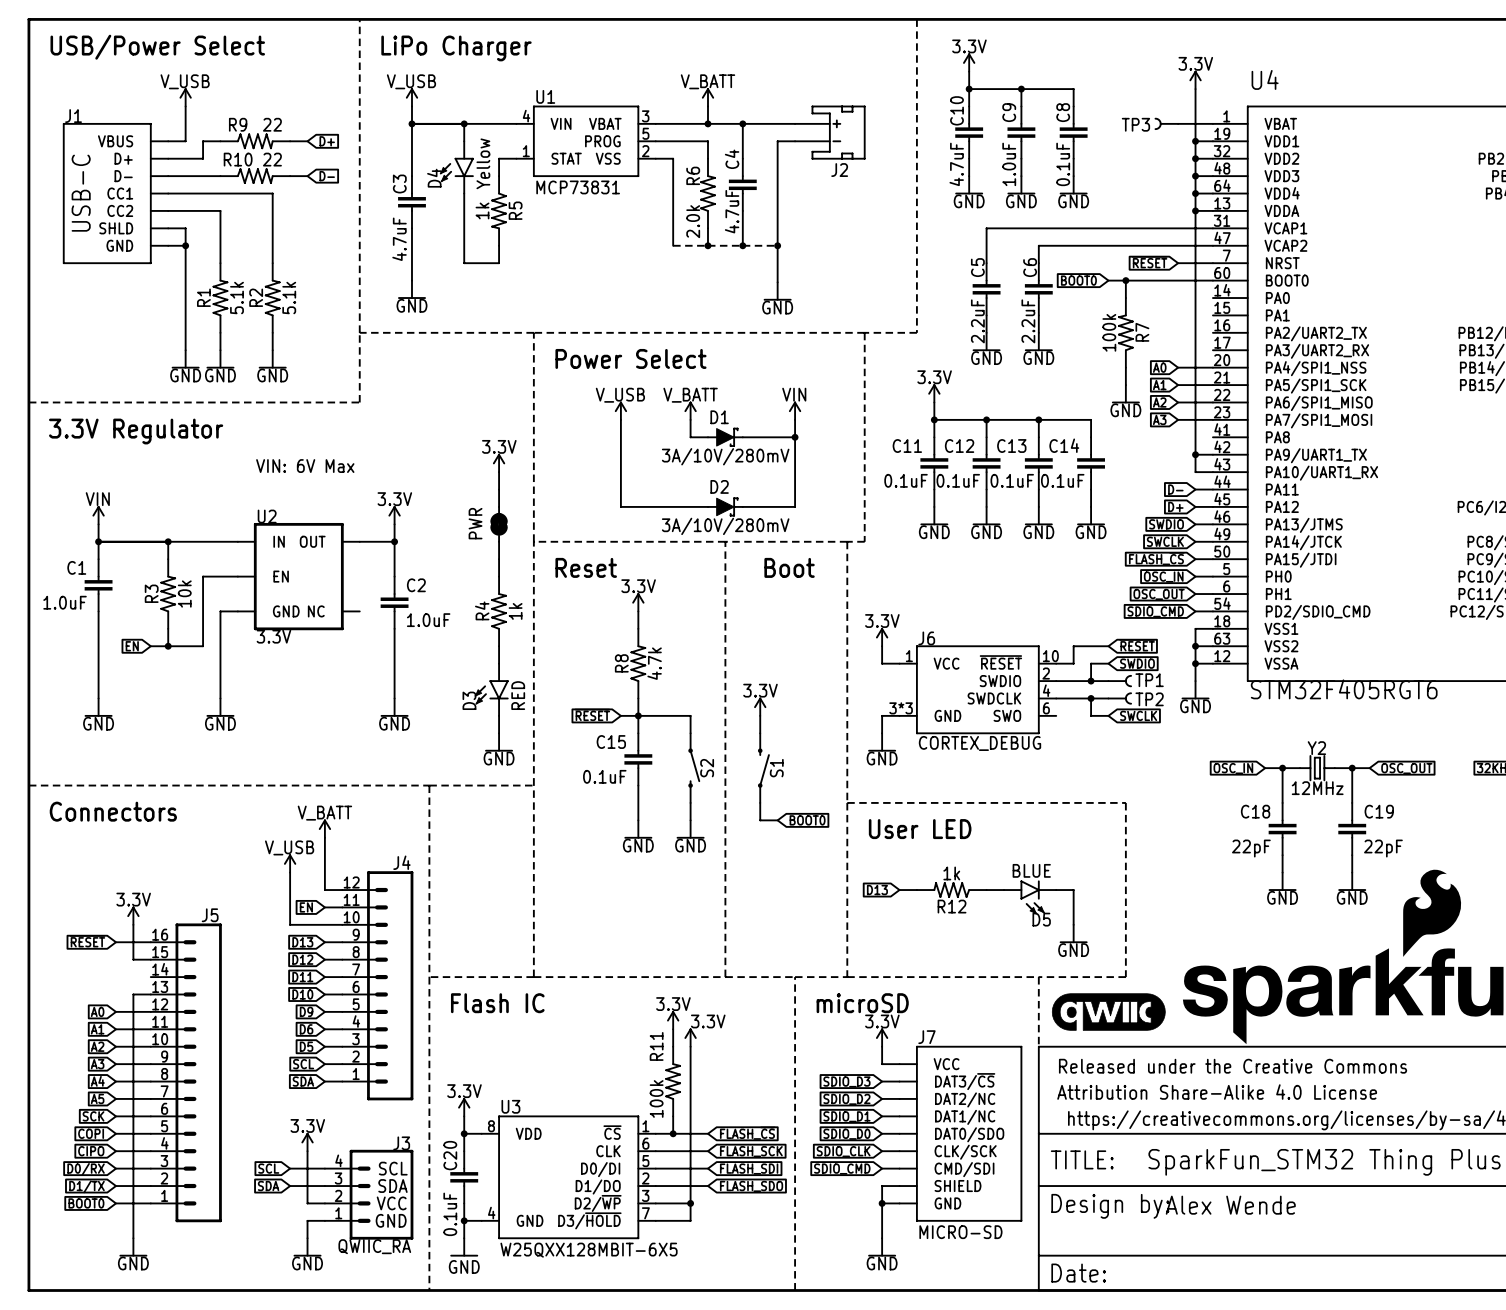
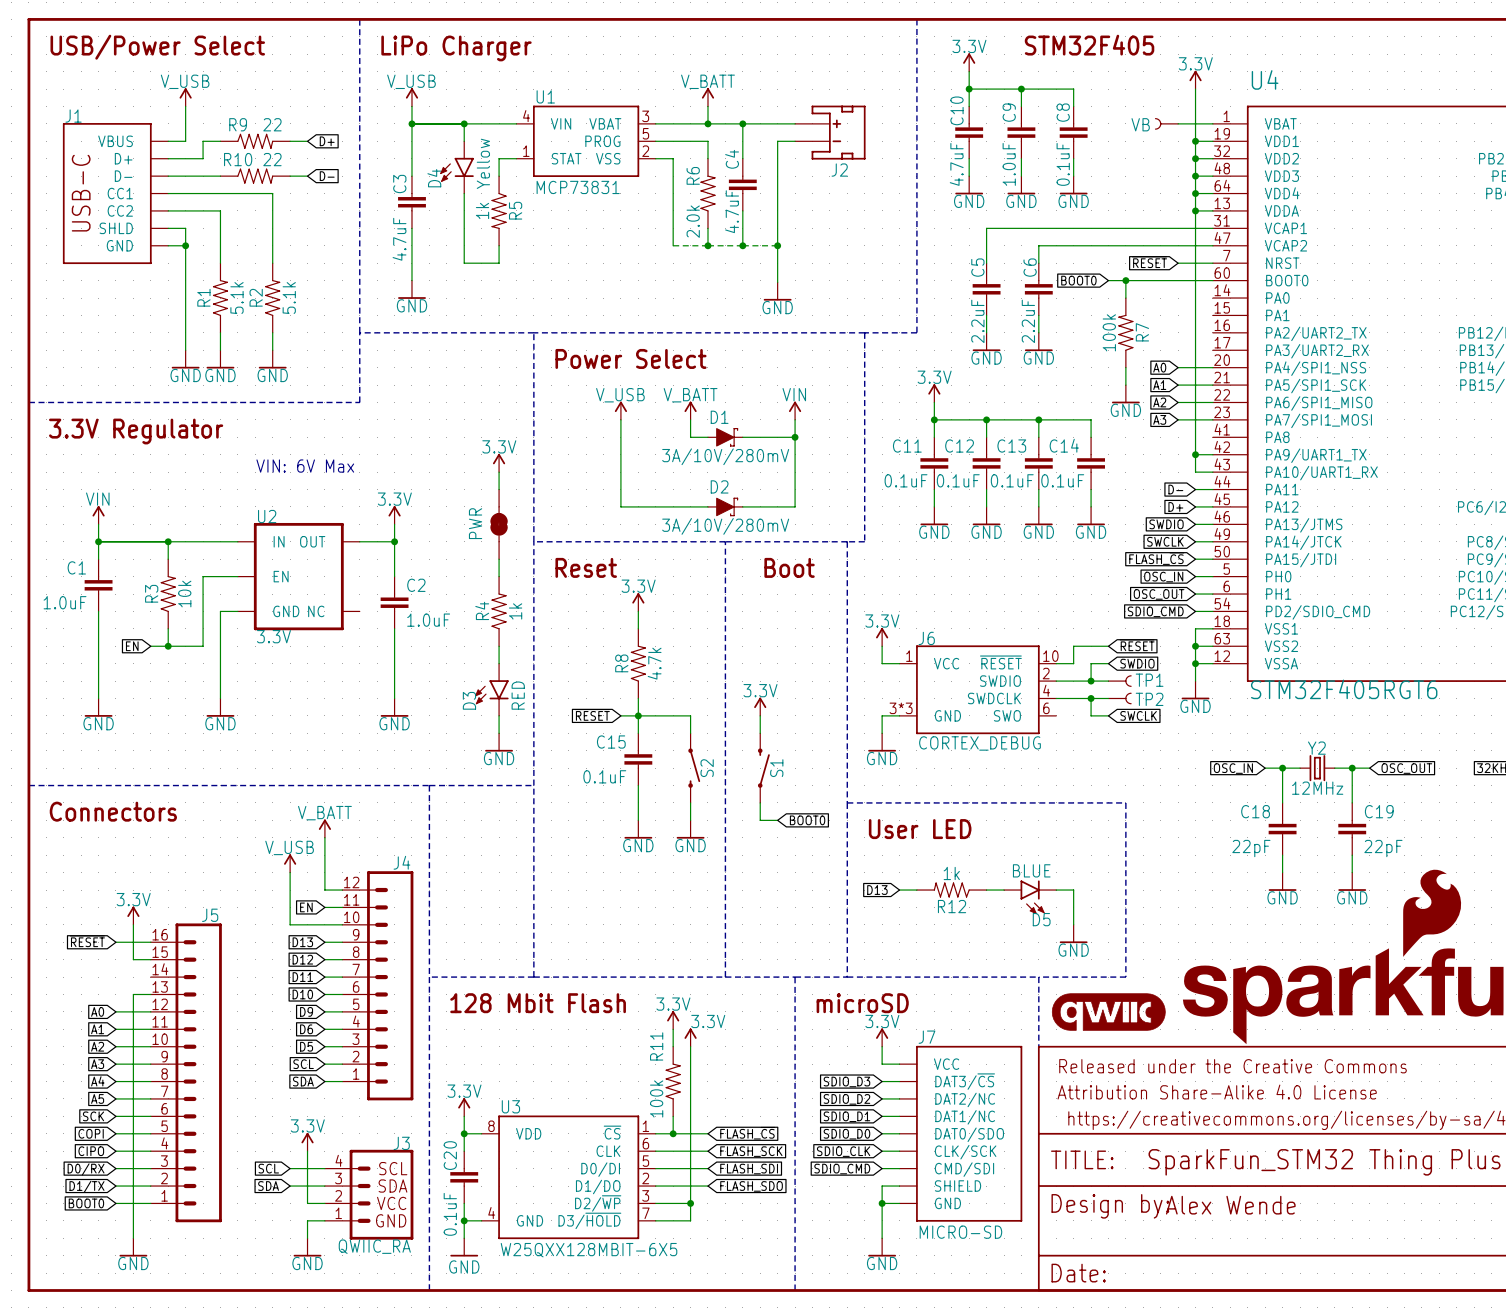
text: none -> STM32F405 (1089, 45)
TP3 name: TP3 (1135, 124) -> VB (1140, 124)
text: Flash IC (497, 1003) -> 128 Mbit Flash (538, 1003)

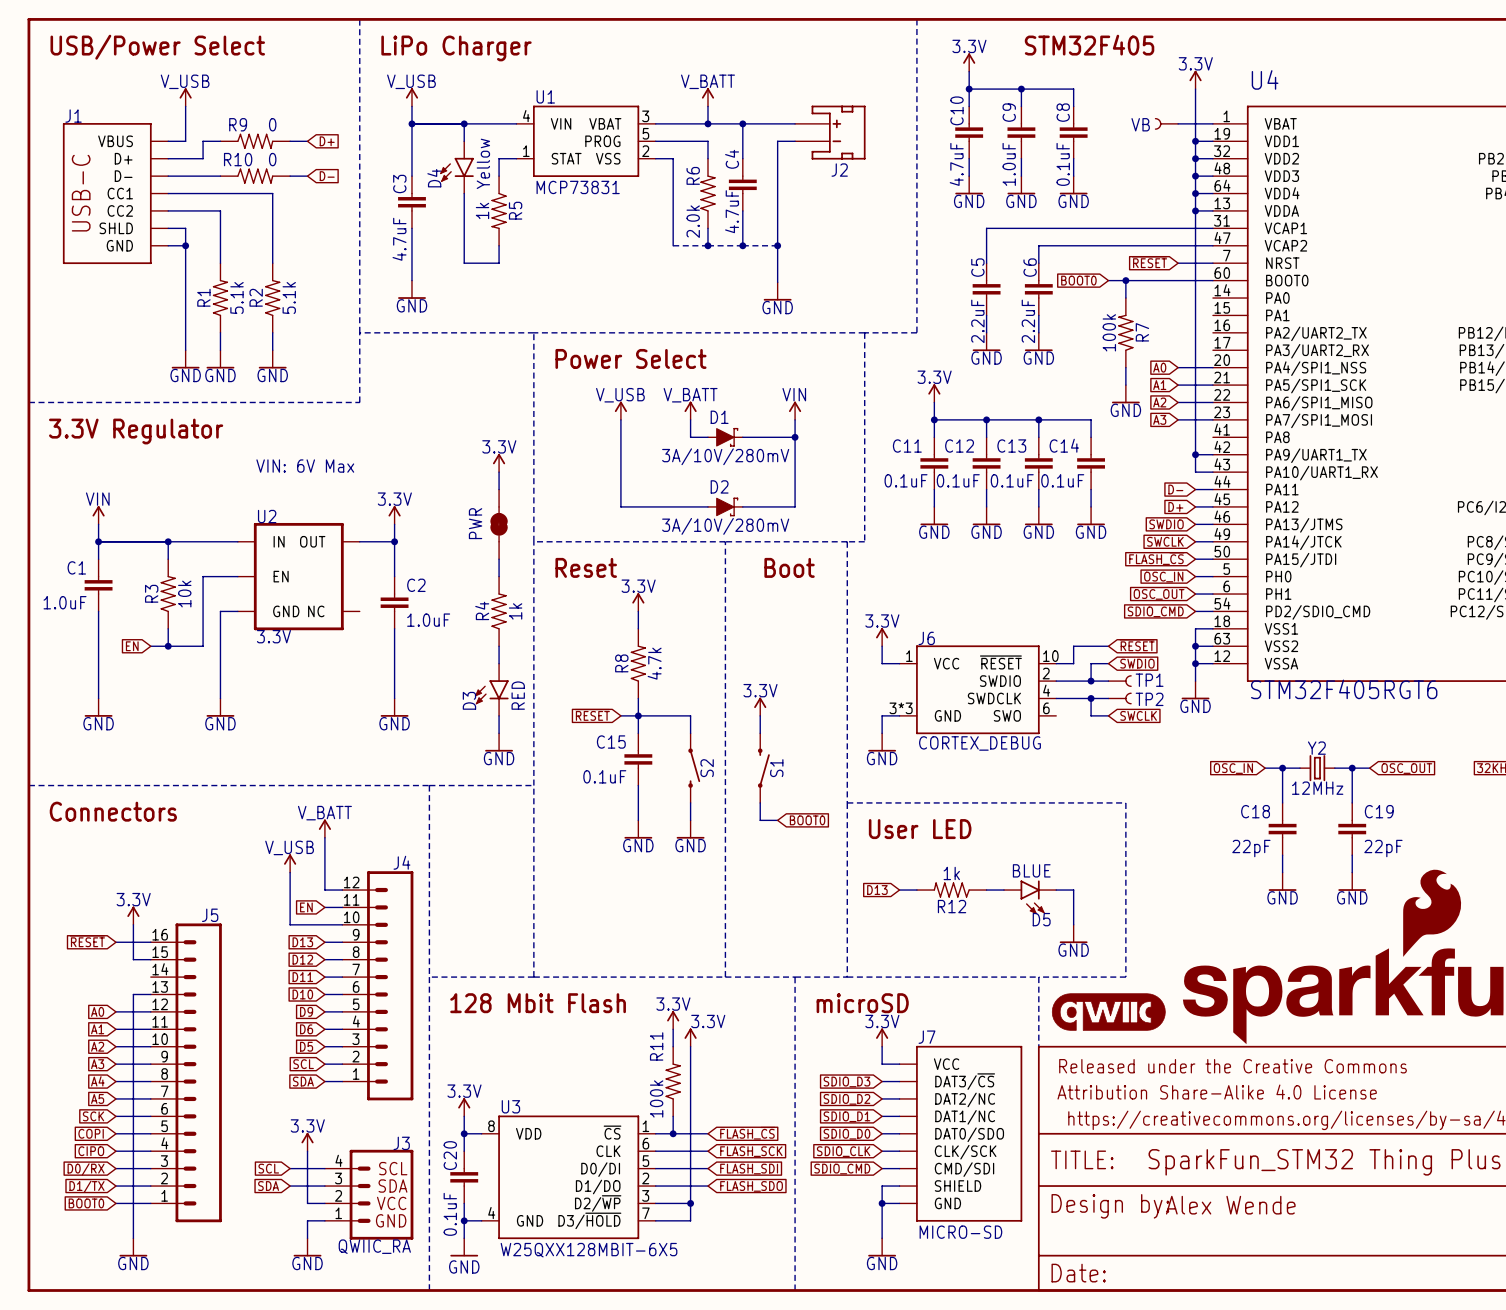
R9 value: 22 (272, 124) -> 0 (272, 124)
R10 value: 22 (272, 159) -> 0 (272, 159)

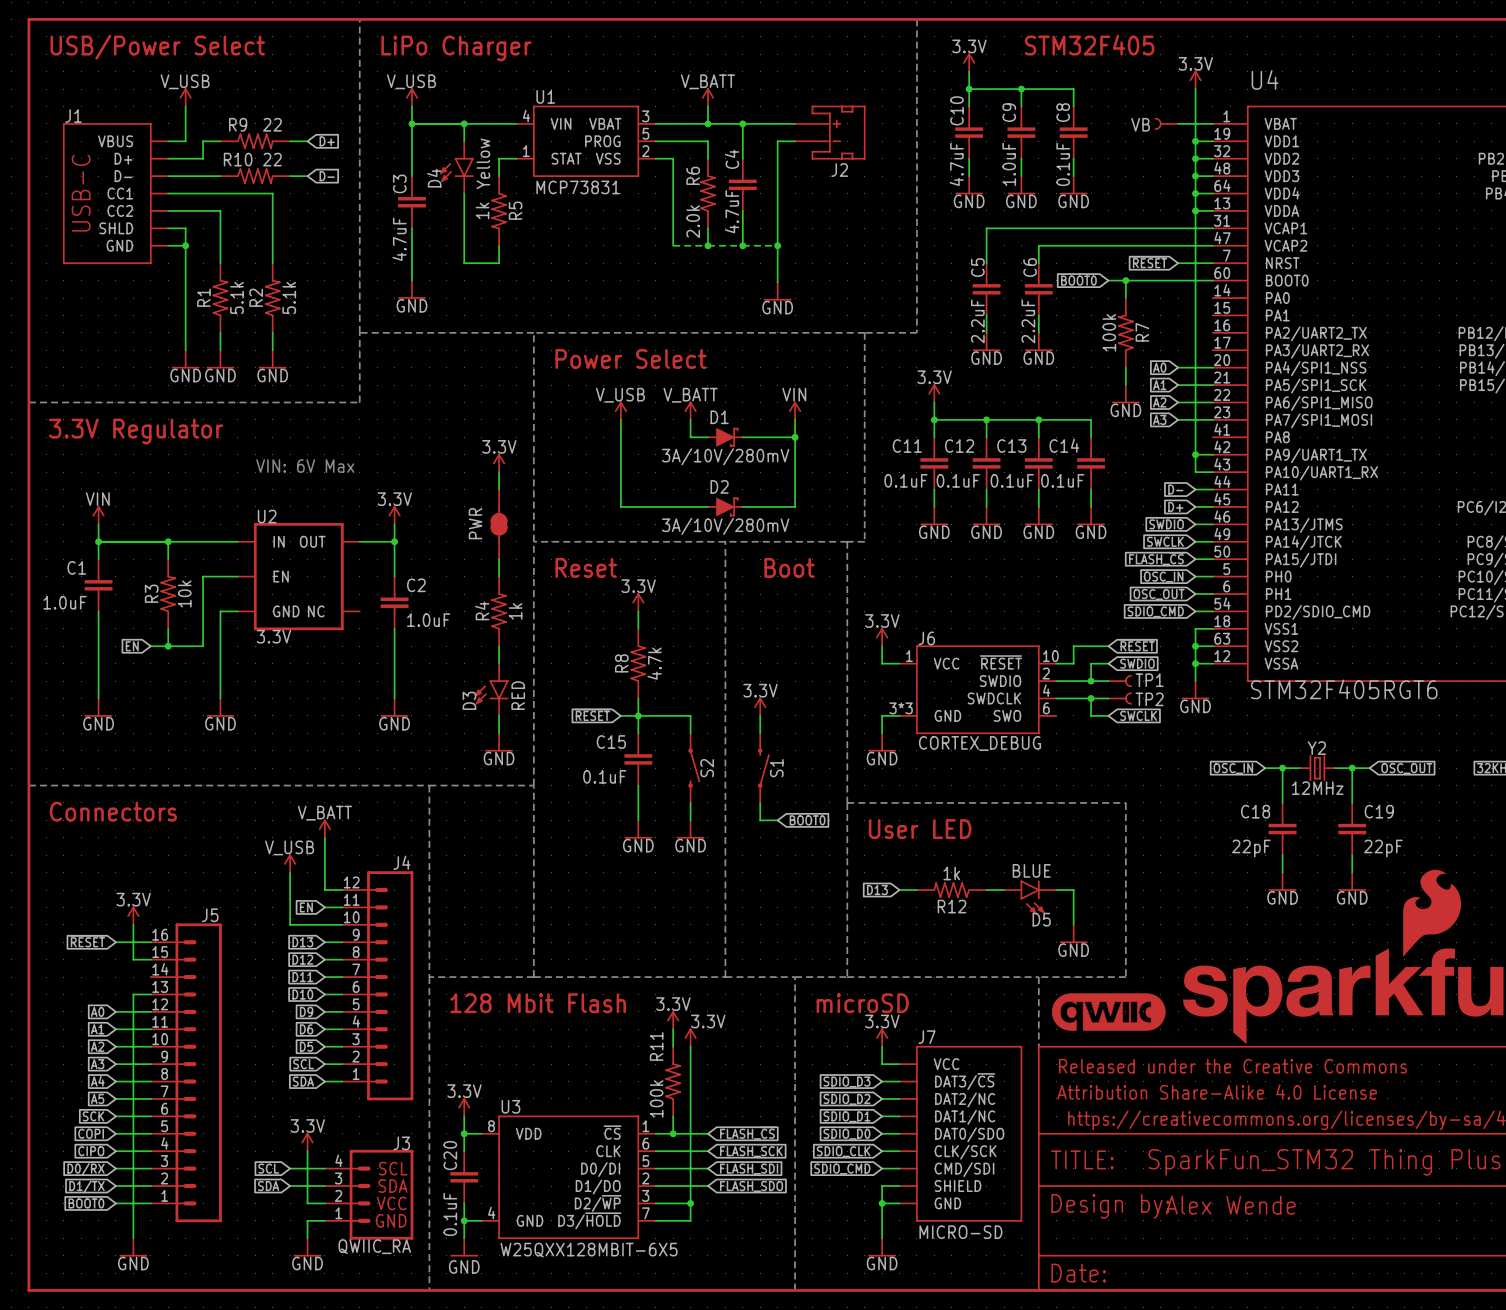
R9 value: 0 (272, 124) -> 22 (272, 124)
R10 value: 0 (272, 159) -> 22 (272, 159)

